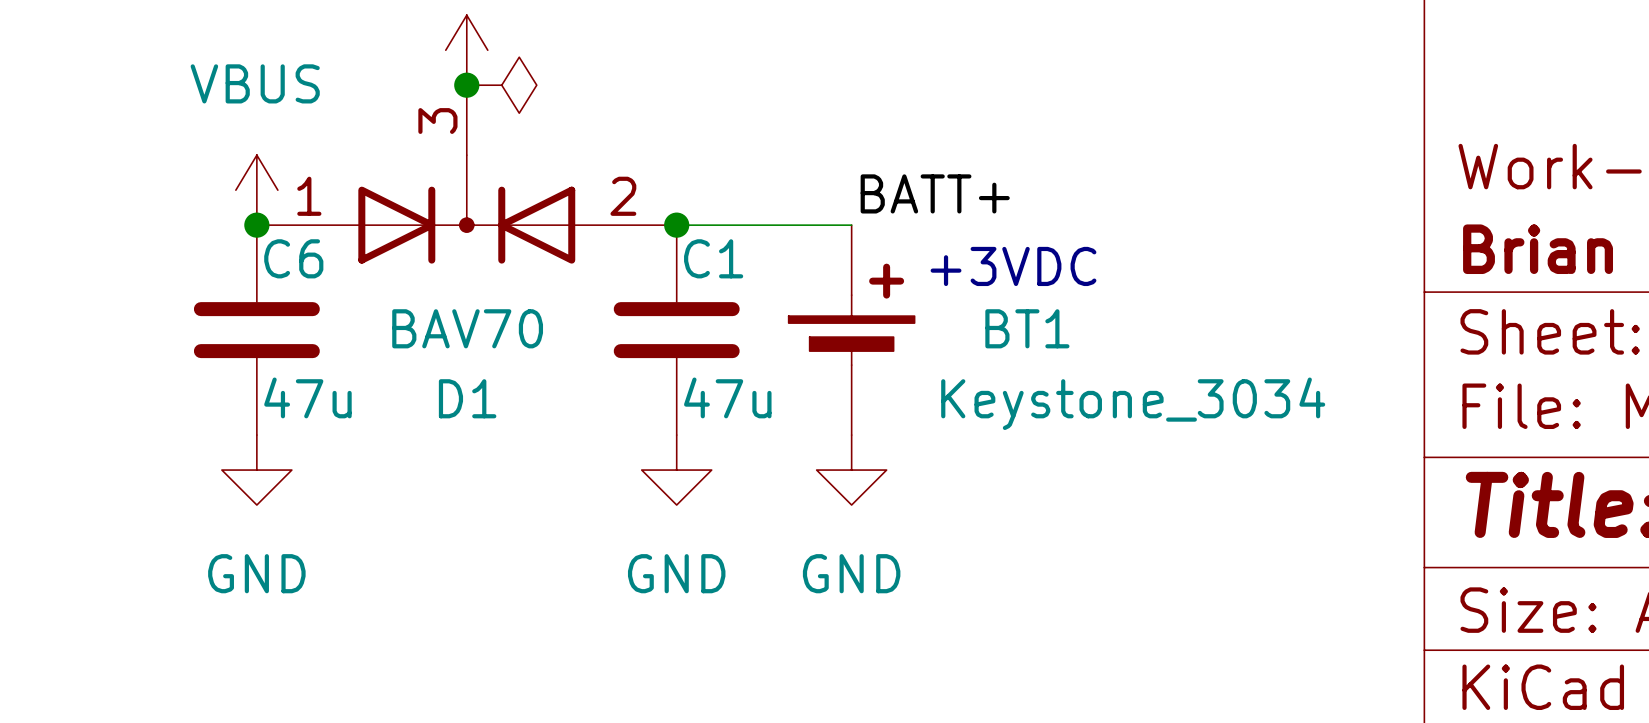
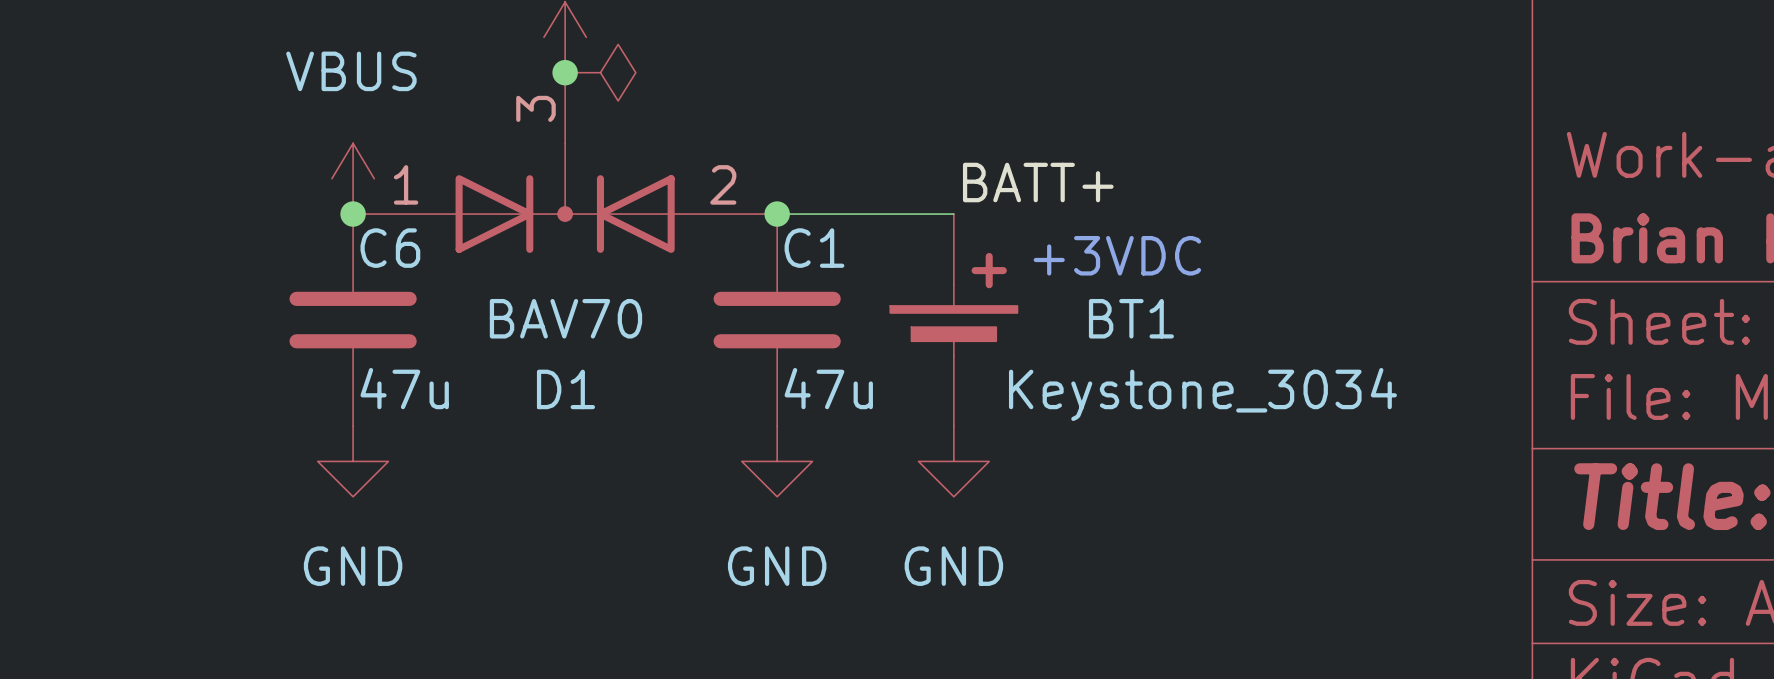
BT1 value position: Keystone_3034 (1133, 403) -> Keystone_3034 (1202, 394)

